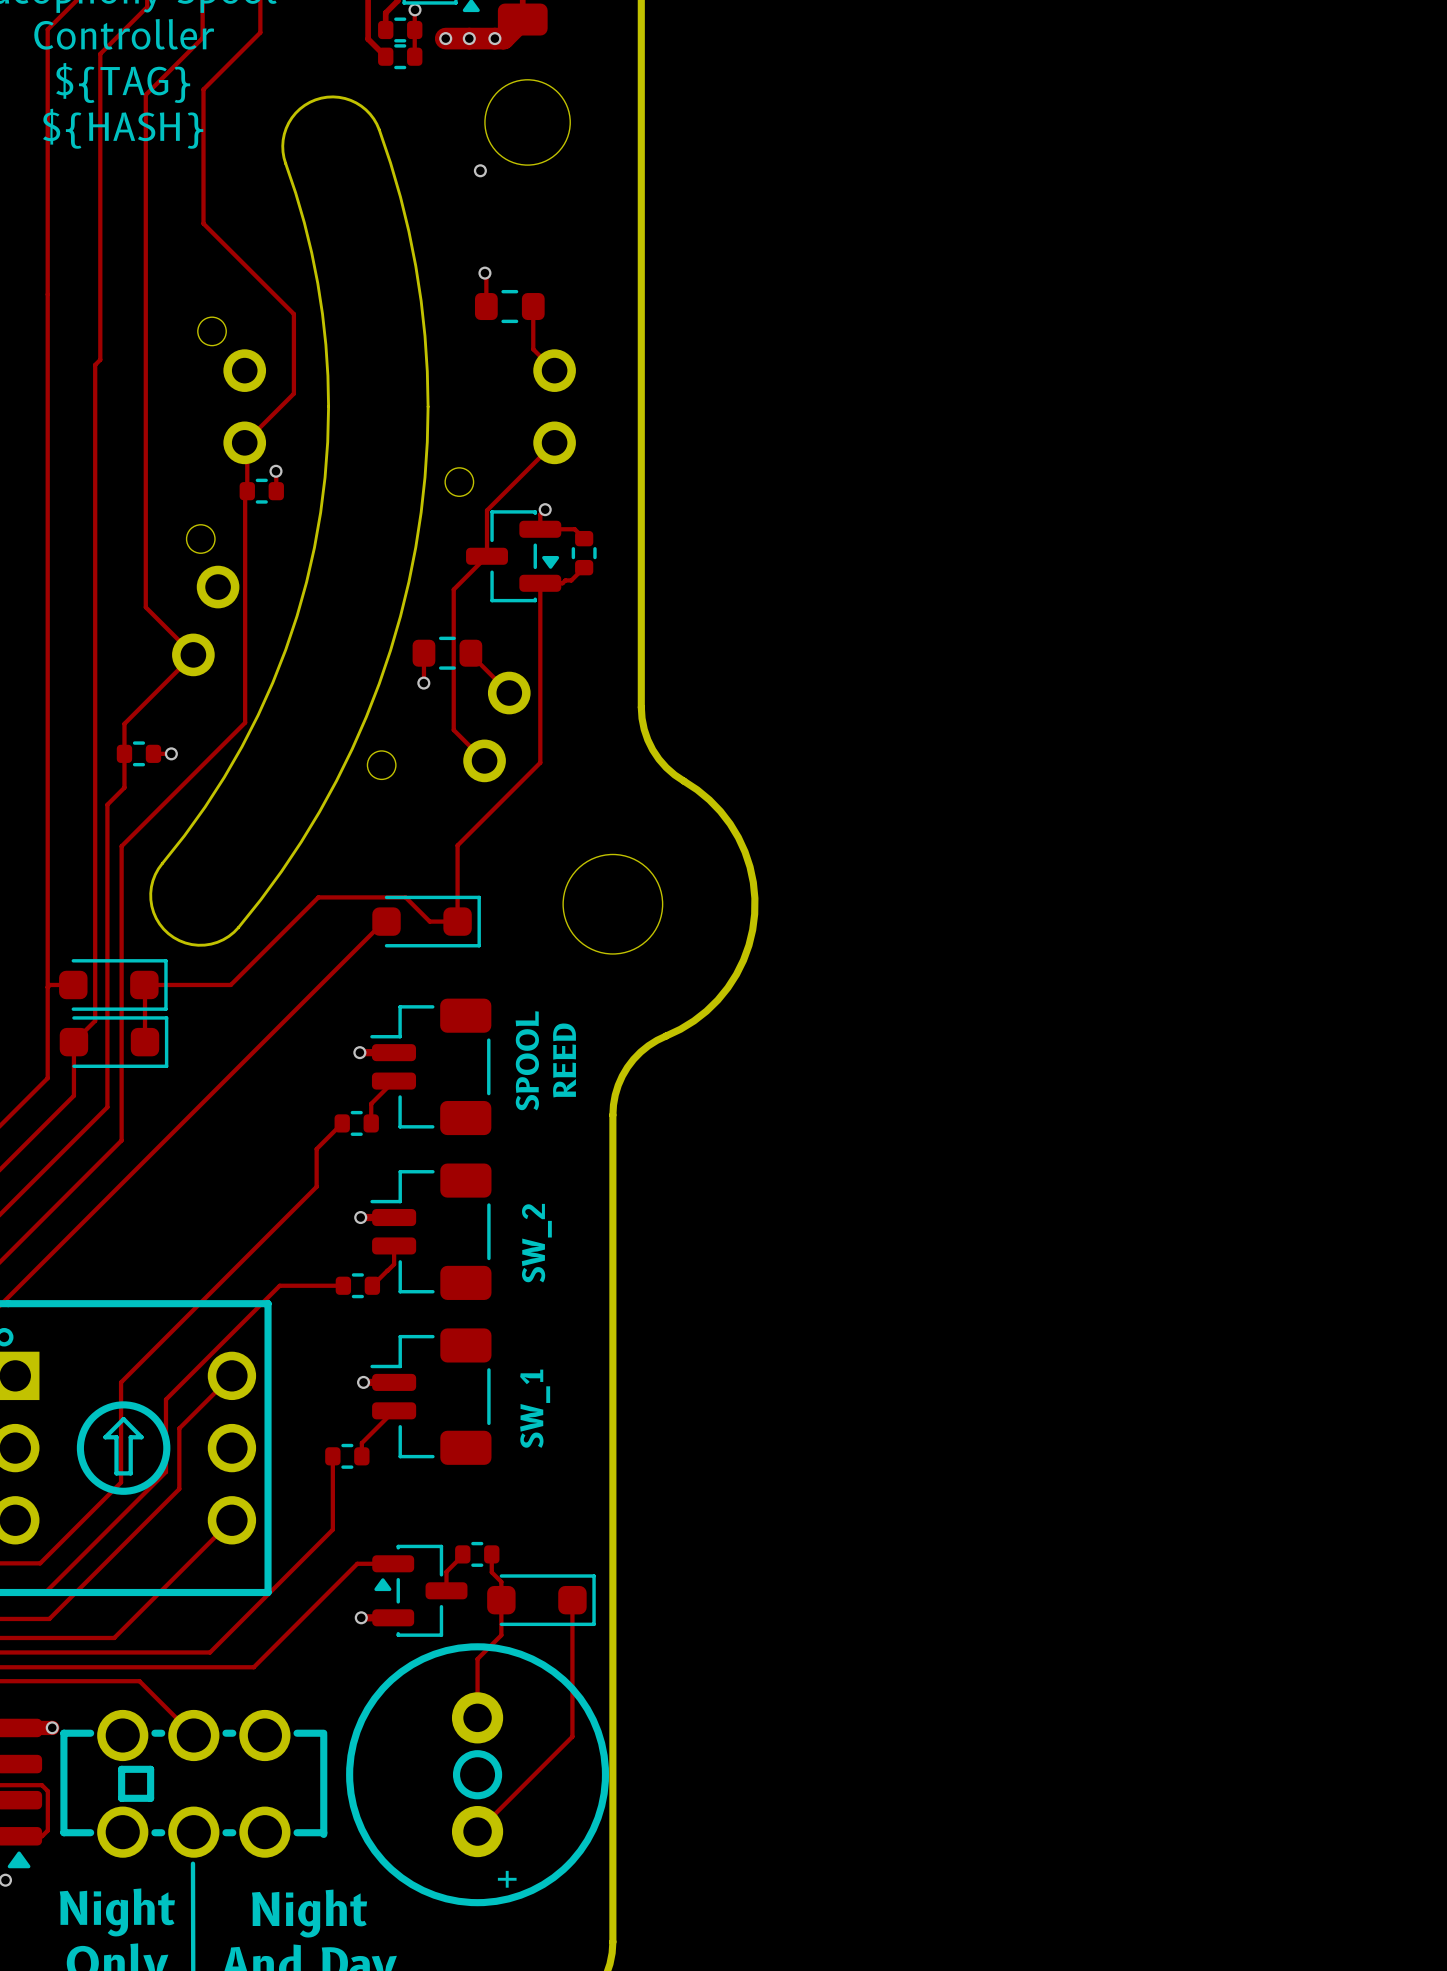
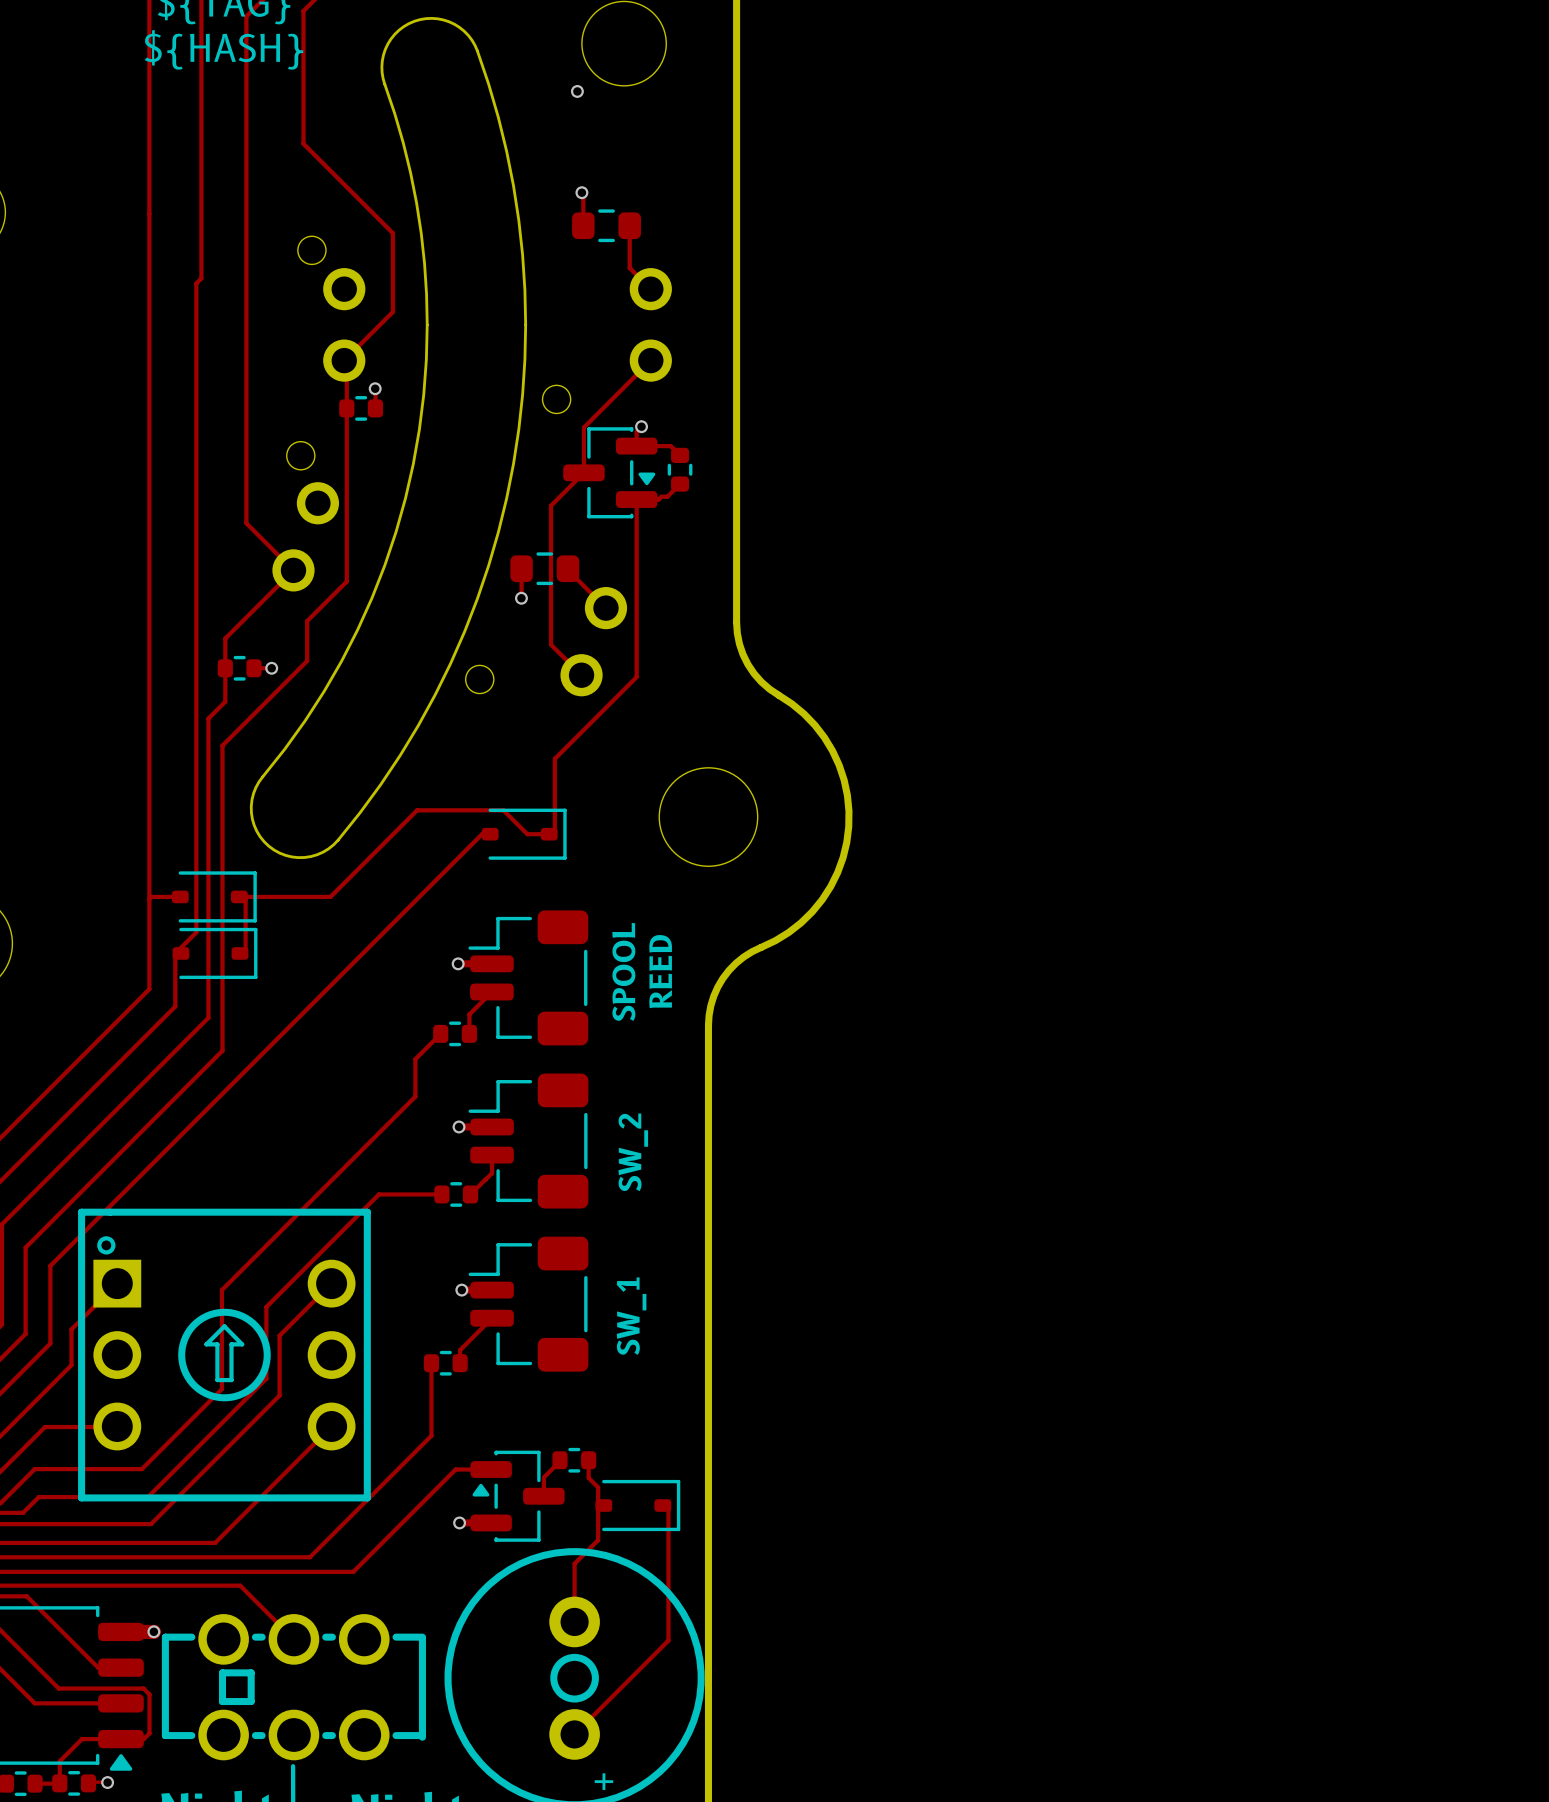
track: (247, 491) (245, 493) (245, 722) (121, 846) -> (346, 408) (346, 581) (307, 621) (307, 660) (222, 745) (222, 759)
part footprint: [372, 895, 481, 948] -> [481, 808, 567, 860]
part footprint: [59, 959, 168, 1011] -> [171, 871, 257, 923]
part footprint: [59, 1016, 169, 1068] -> [172, 927, 258, 980]
part footprint: [487, 1574, 596, 1627] -> [595, 1479, 681, 1532]

